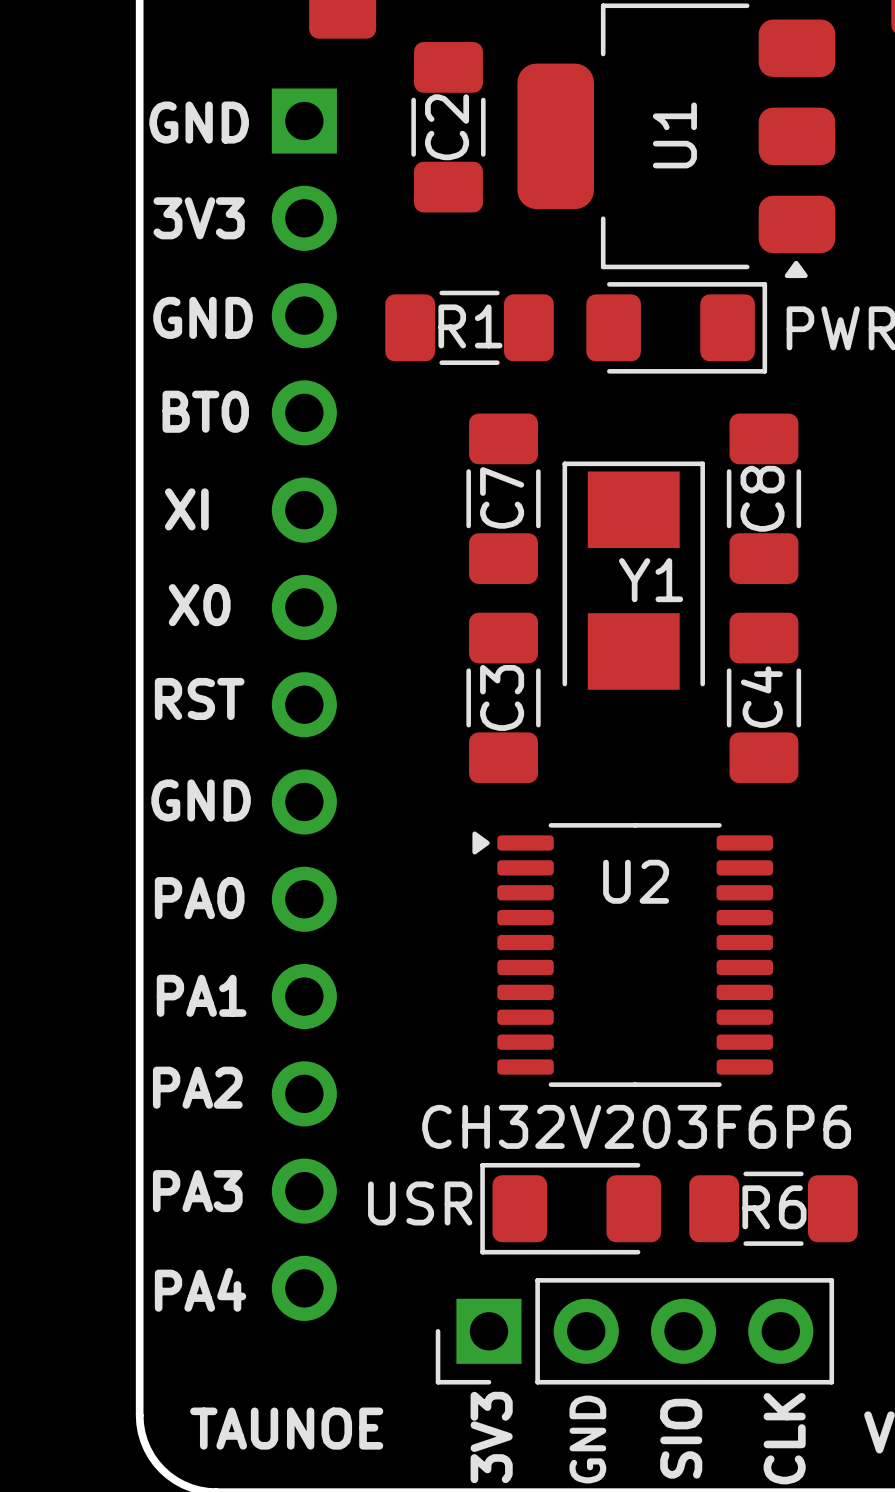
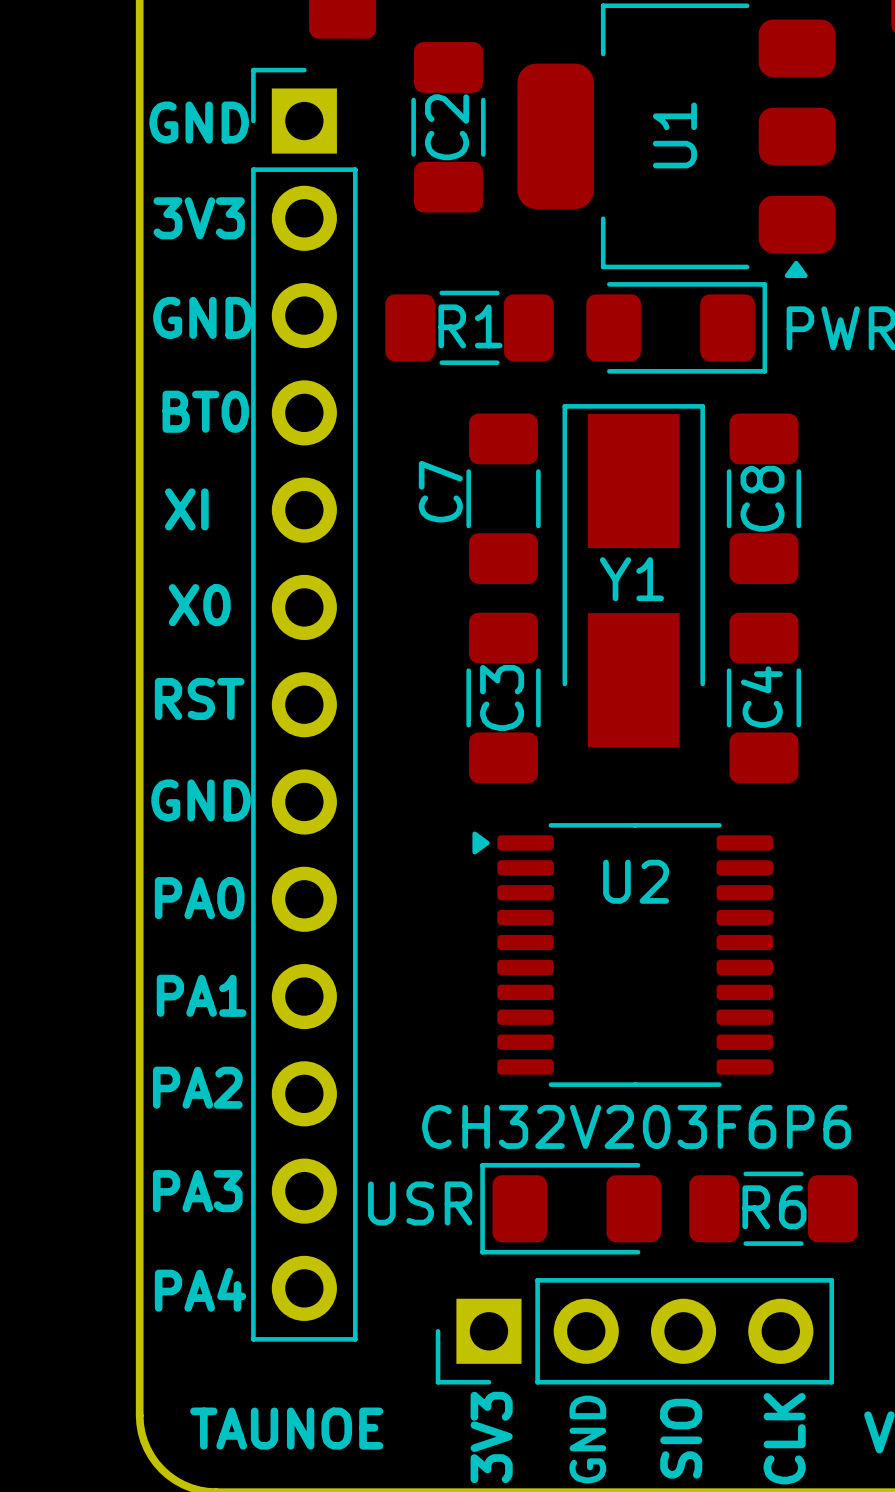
Y1 footprint: [562, 461, 705, 690] -> [562, 404, 705, 748]
C7 name position: C7 (502, 497) -> C7 (440, 491)
part side: bottom (304, 704) -> top (304, 704)

